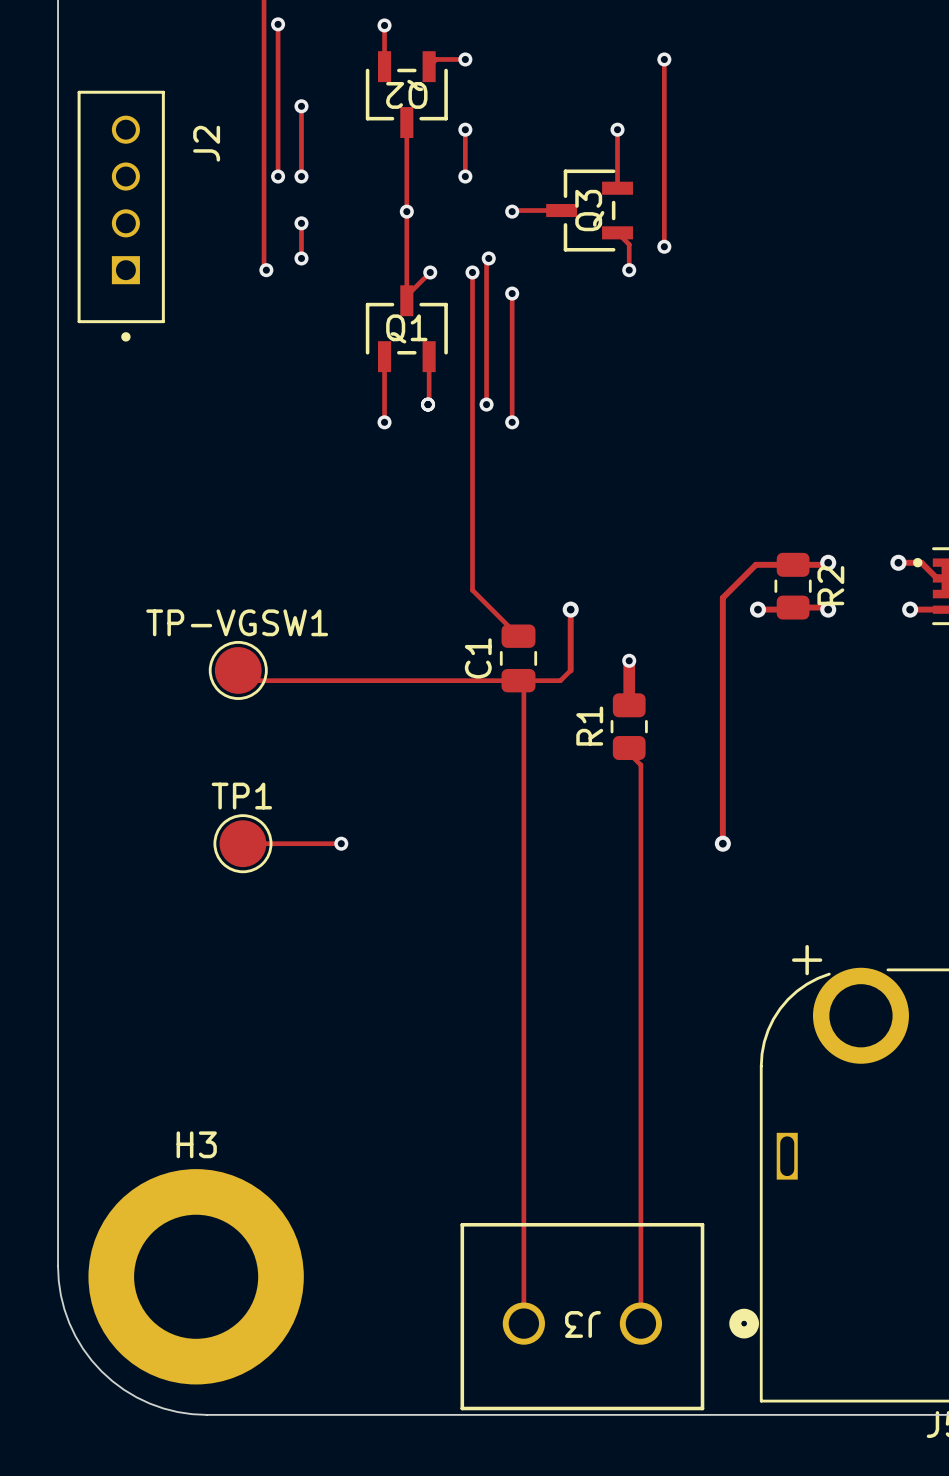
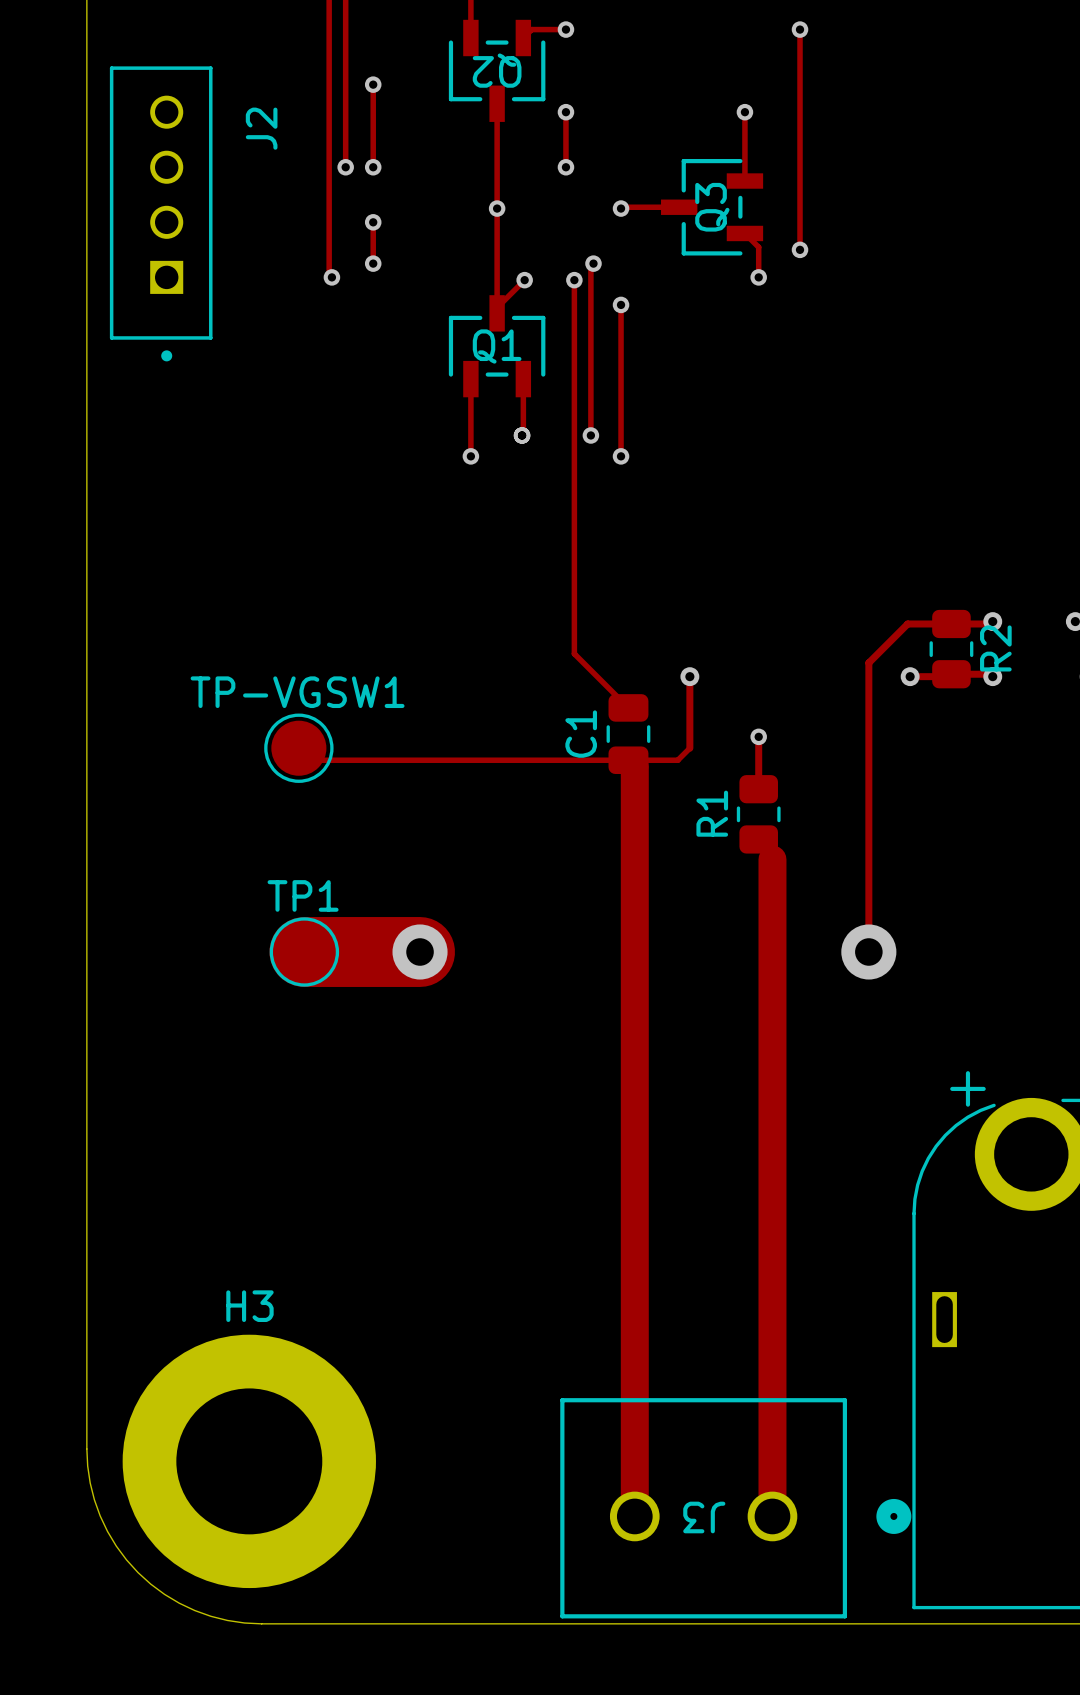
track width: thick (629, 660) (629, 699) -> thin (758, 736) (758, 782)
track width: thin (523, 686) (523, 1323) -> thick (634, 766) (634, 1516)
track width: thin (640, 765) (640, 1323) -> thick (772, 859) (772, 1516)
via size: [714, 835, 731, 852] -> [841, 924, 897, 980]
via size: [334, 836, 349, 851] -> [392, 924, 448, 980]
track width: thin (242, 843) (341, 843) -> thick (304, 951) (420, 951)

